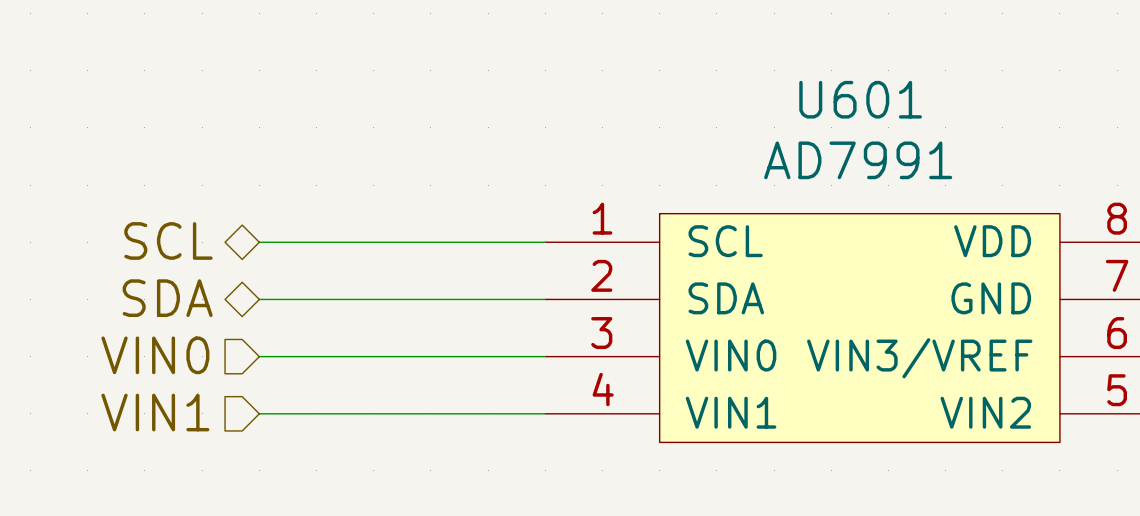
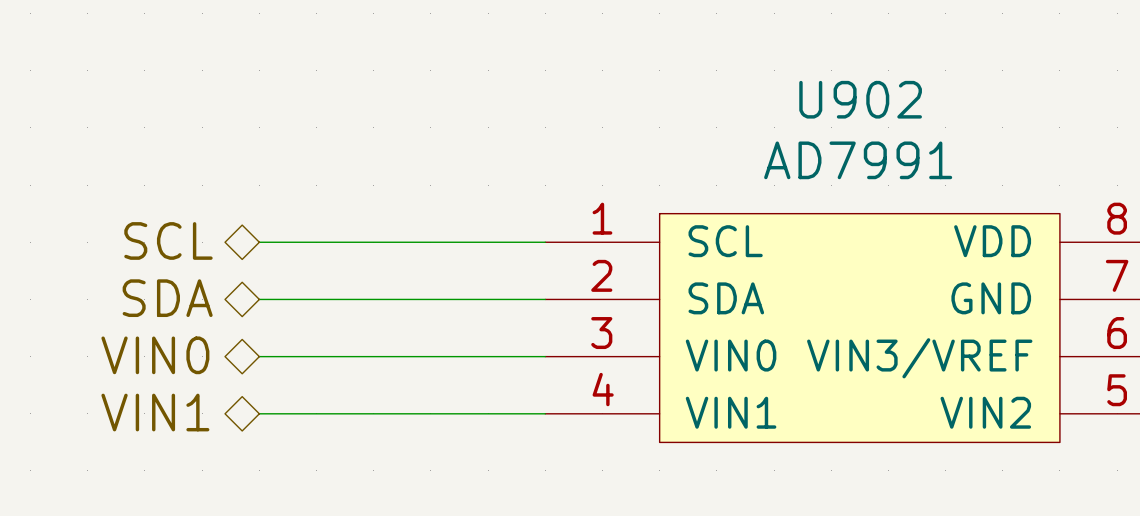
U601 name: U601 (860, 99) -> U902 (860, 99)
hierarchical label shape: input (155, 355) -> bidirectional (155, 355)
hierarchical label shape: input (155, 412) -> bidirectional (155, 412)

